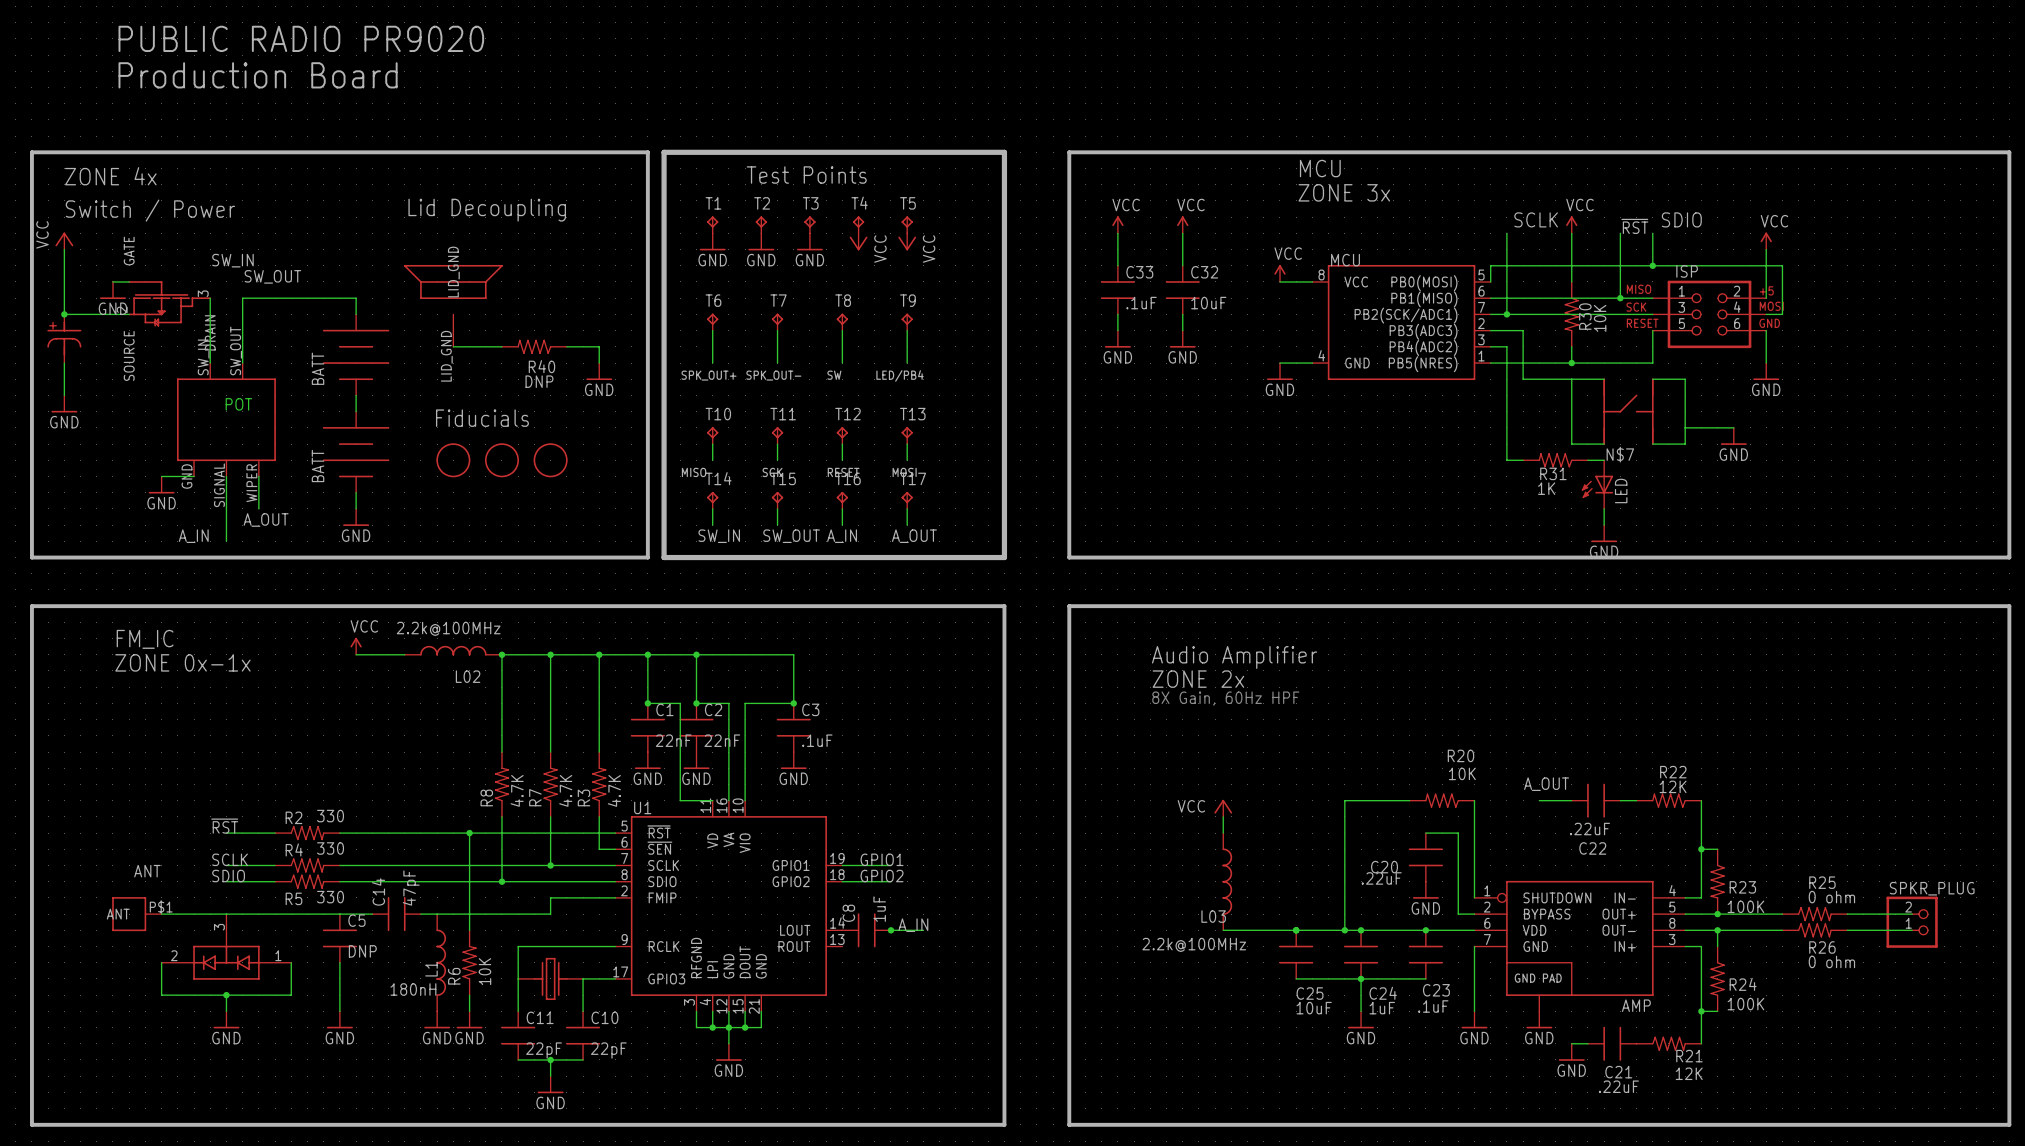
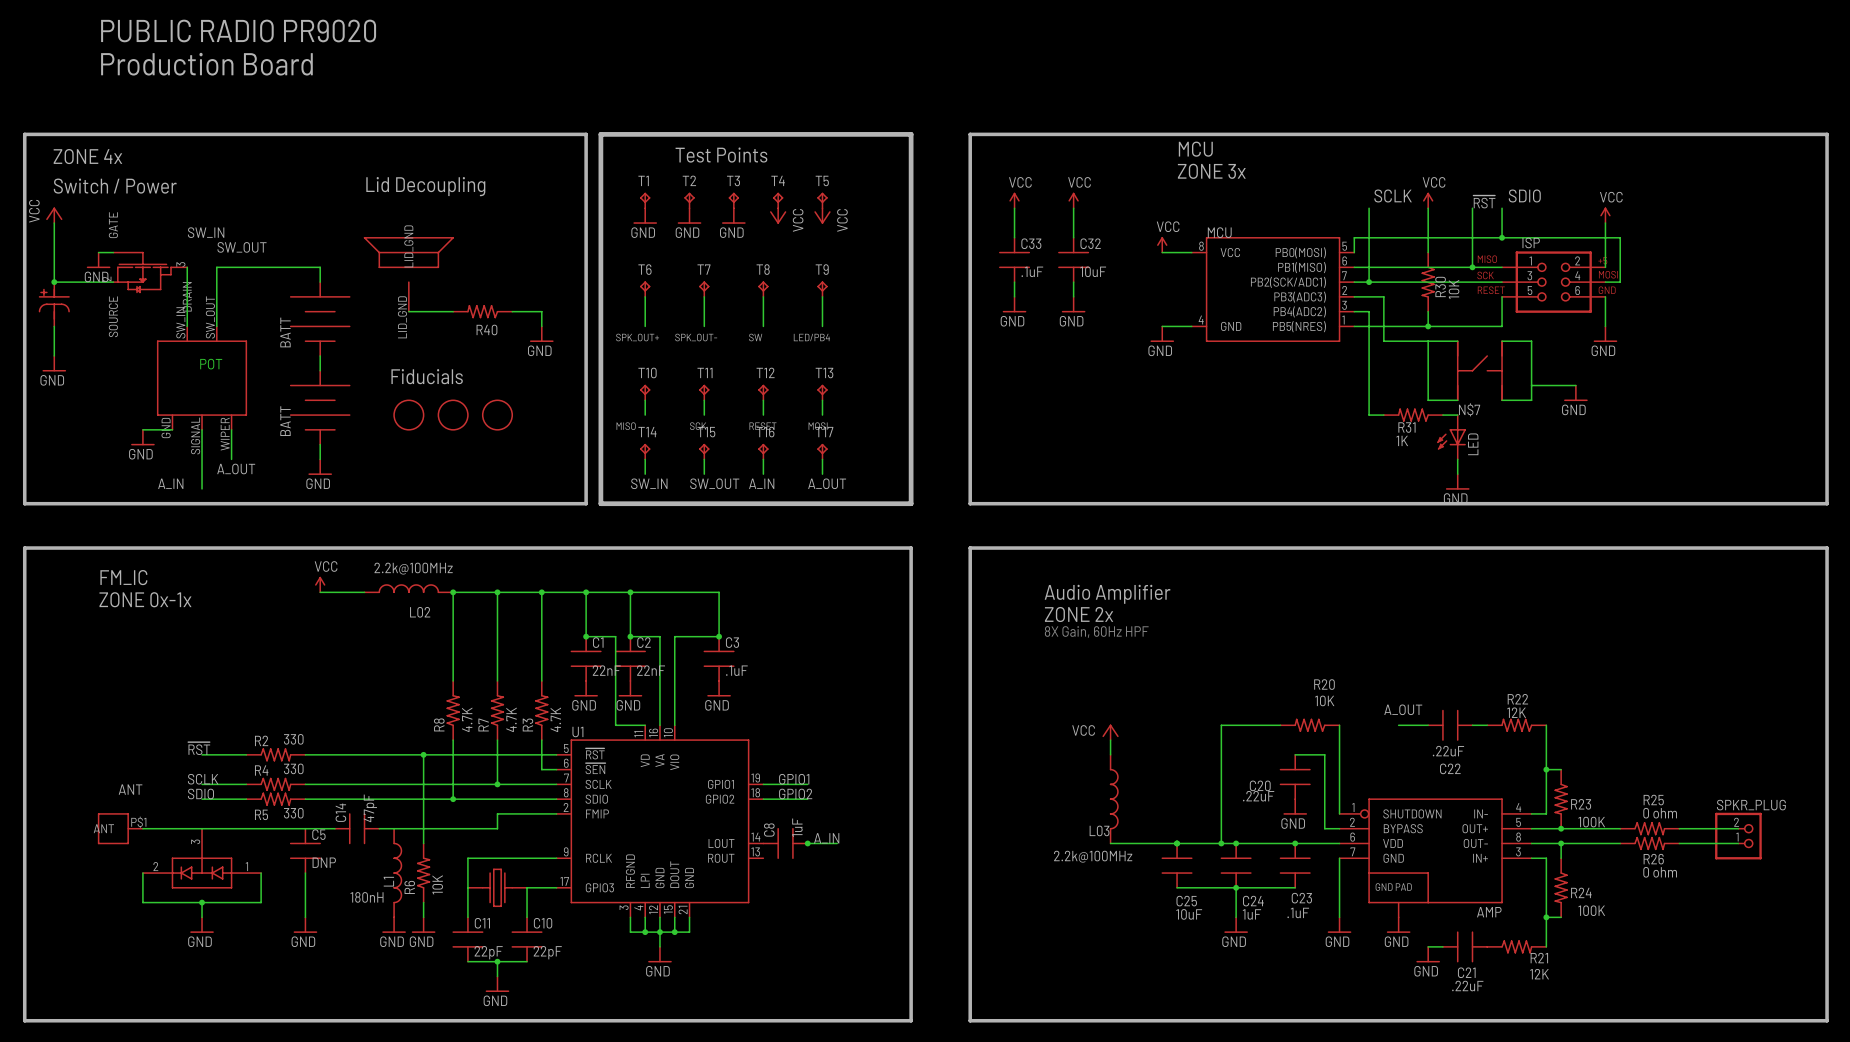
R40 value: DNP (539, 381) -> none

